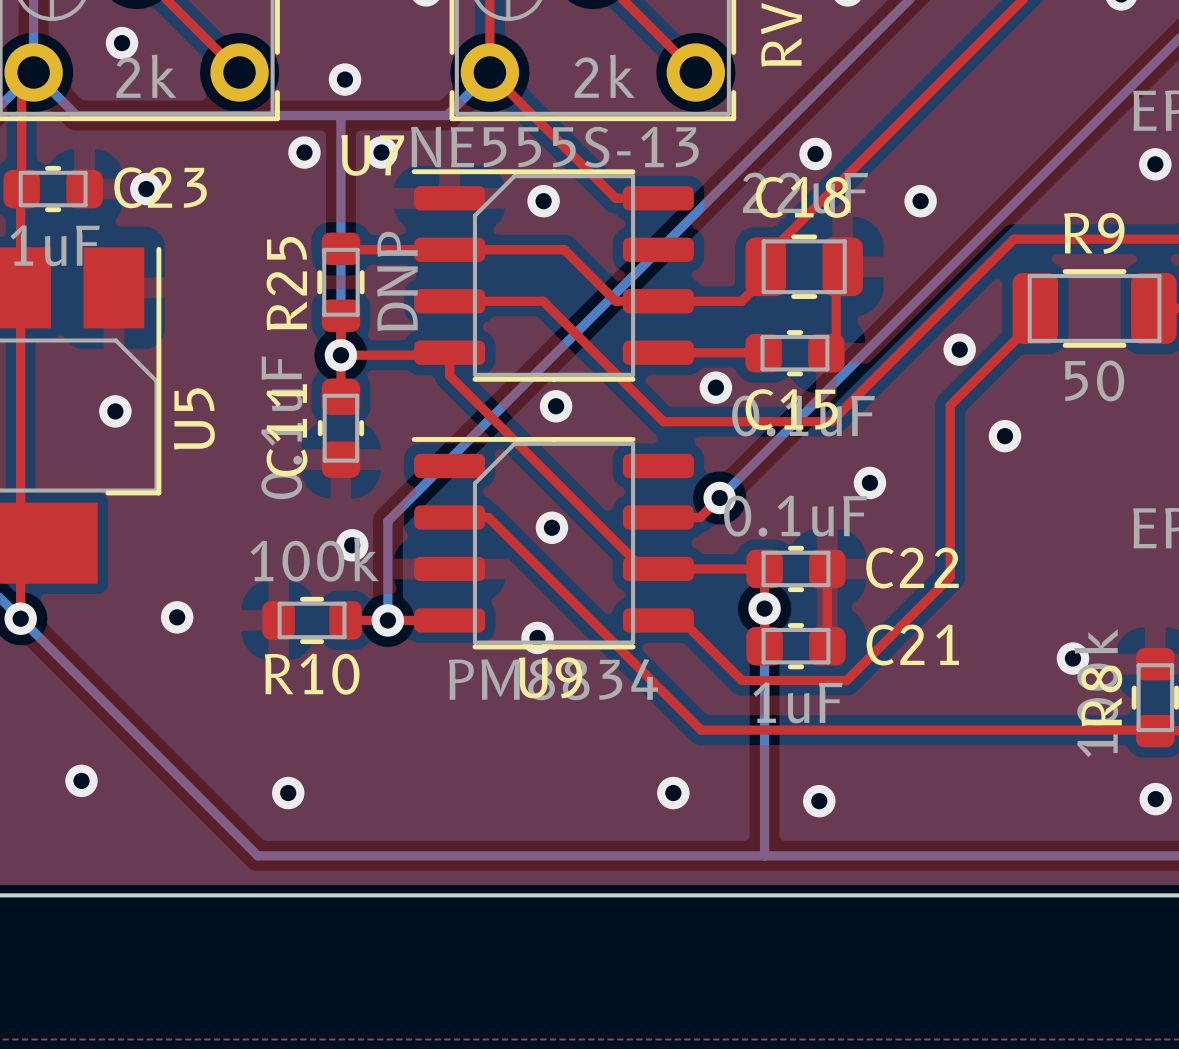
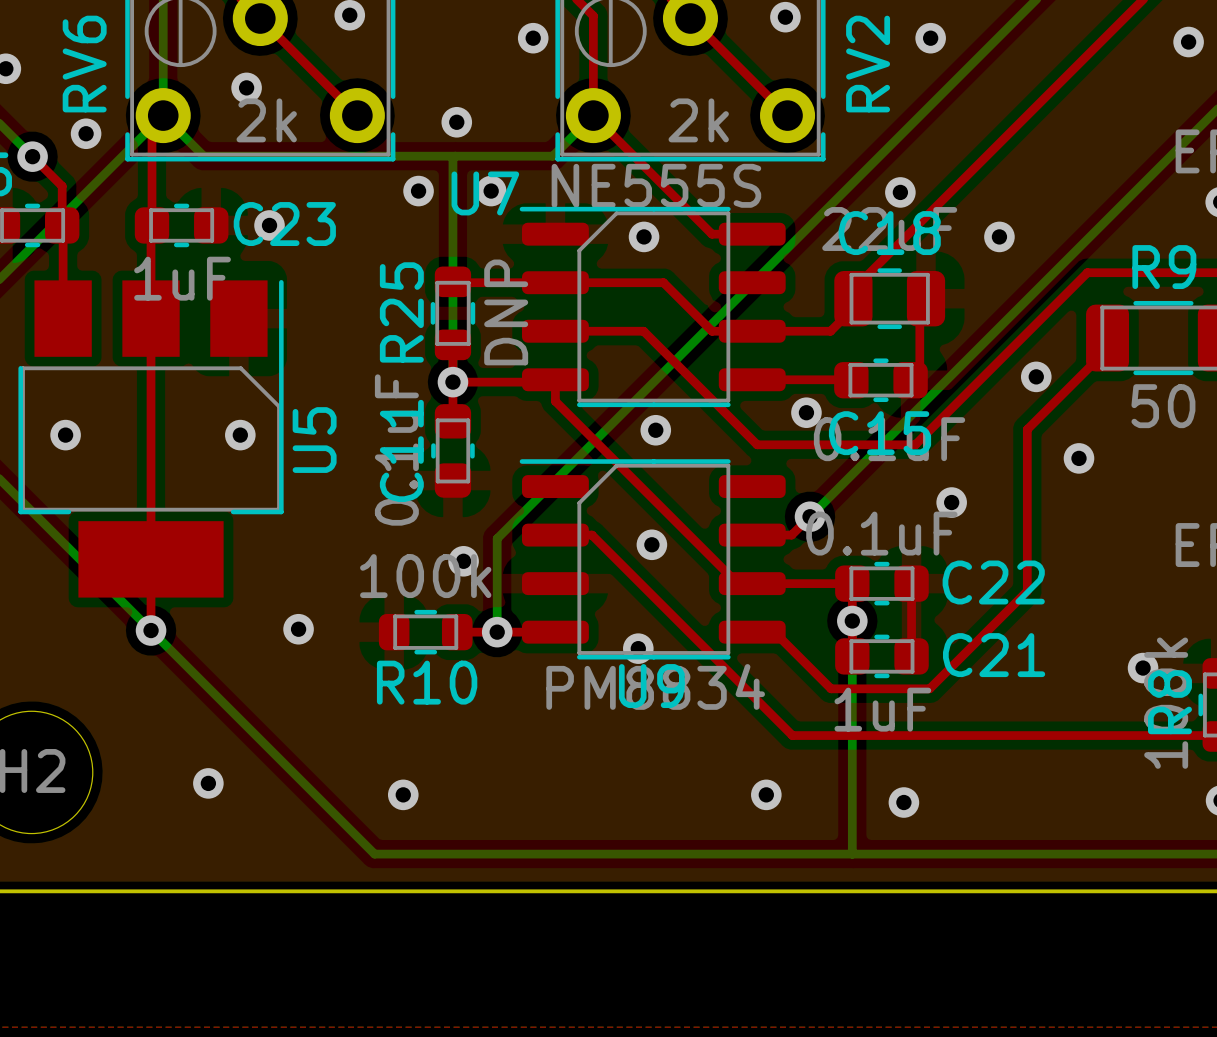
U7 value: NE555S-13 (554, 147) -> NE555S (656, 185)

